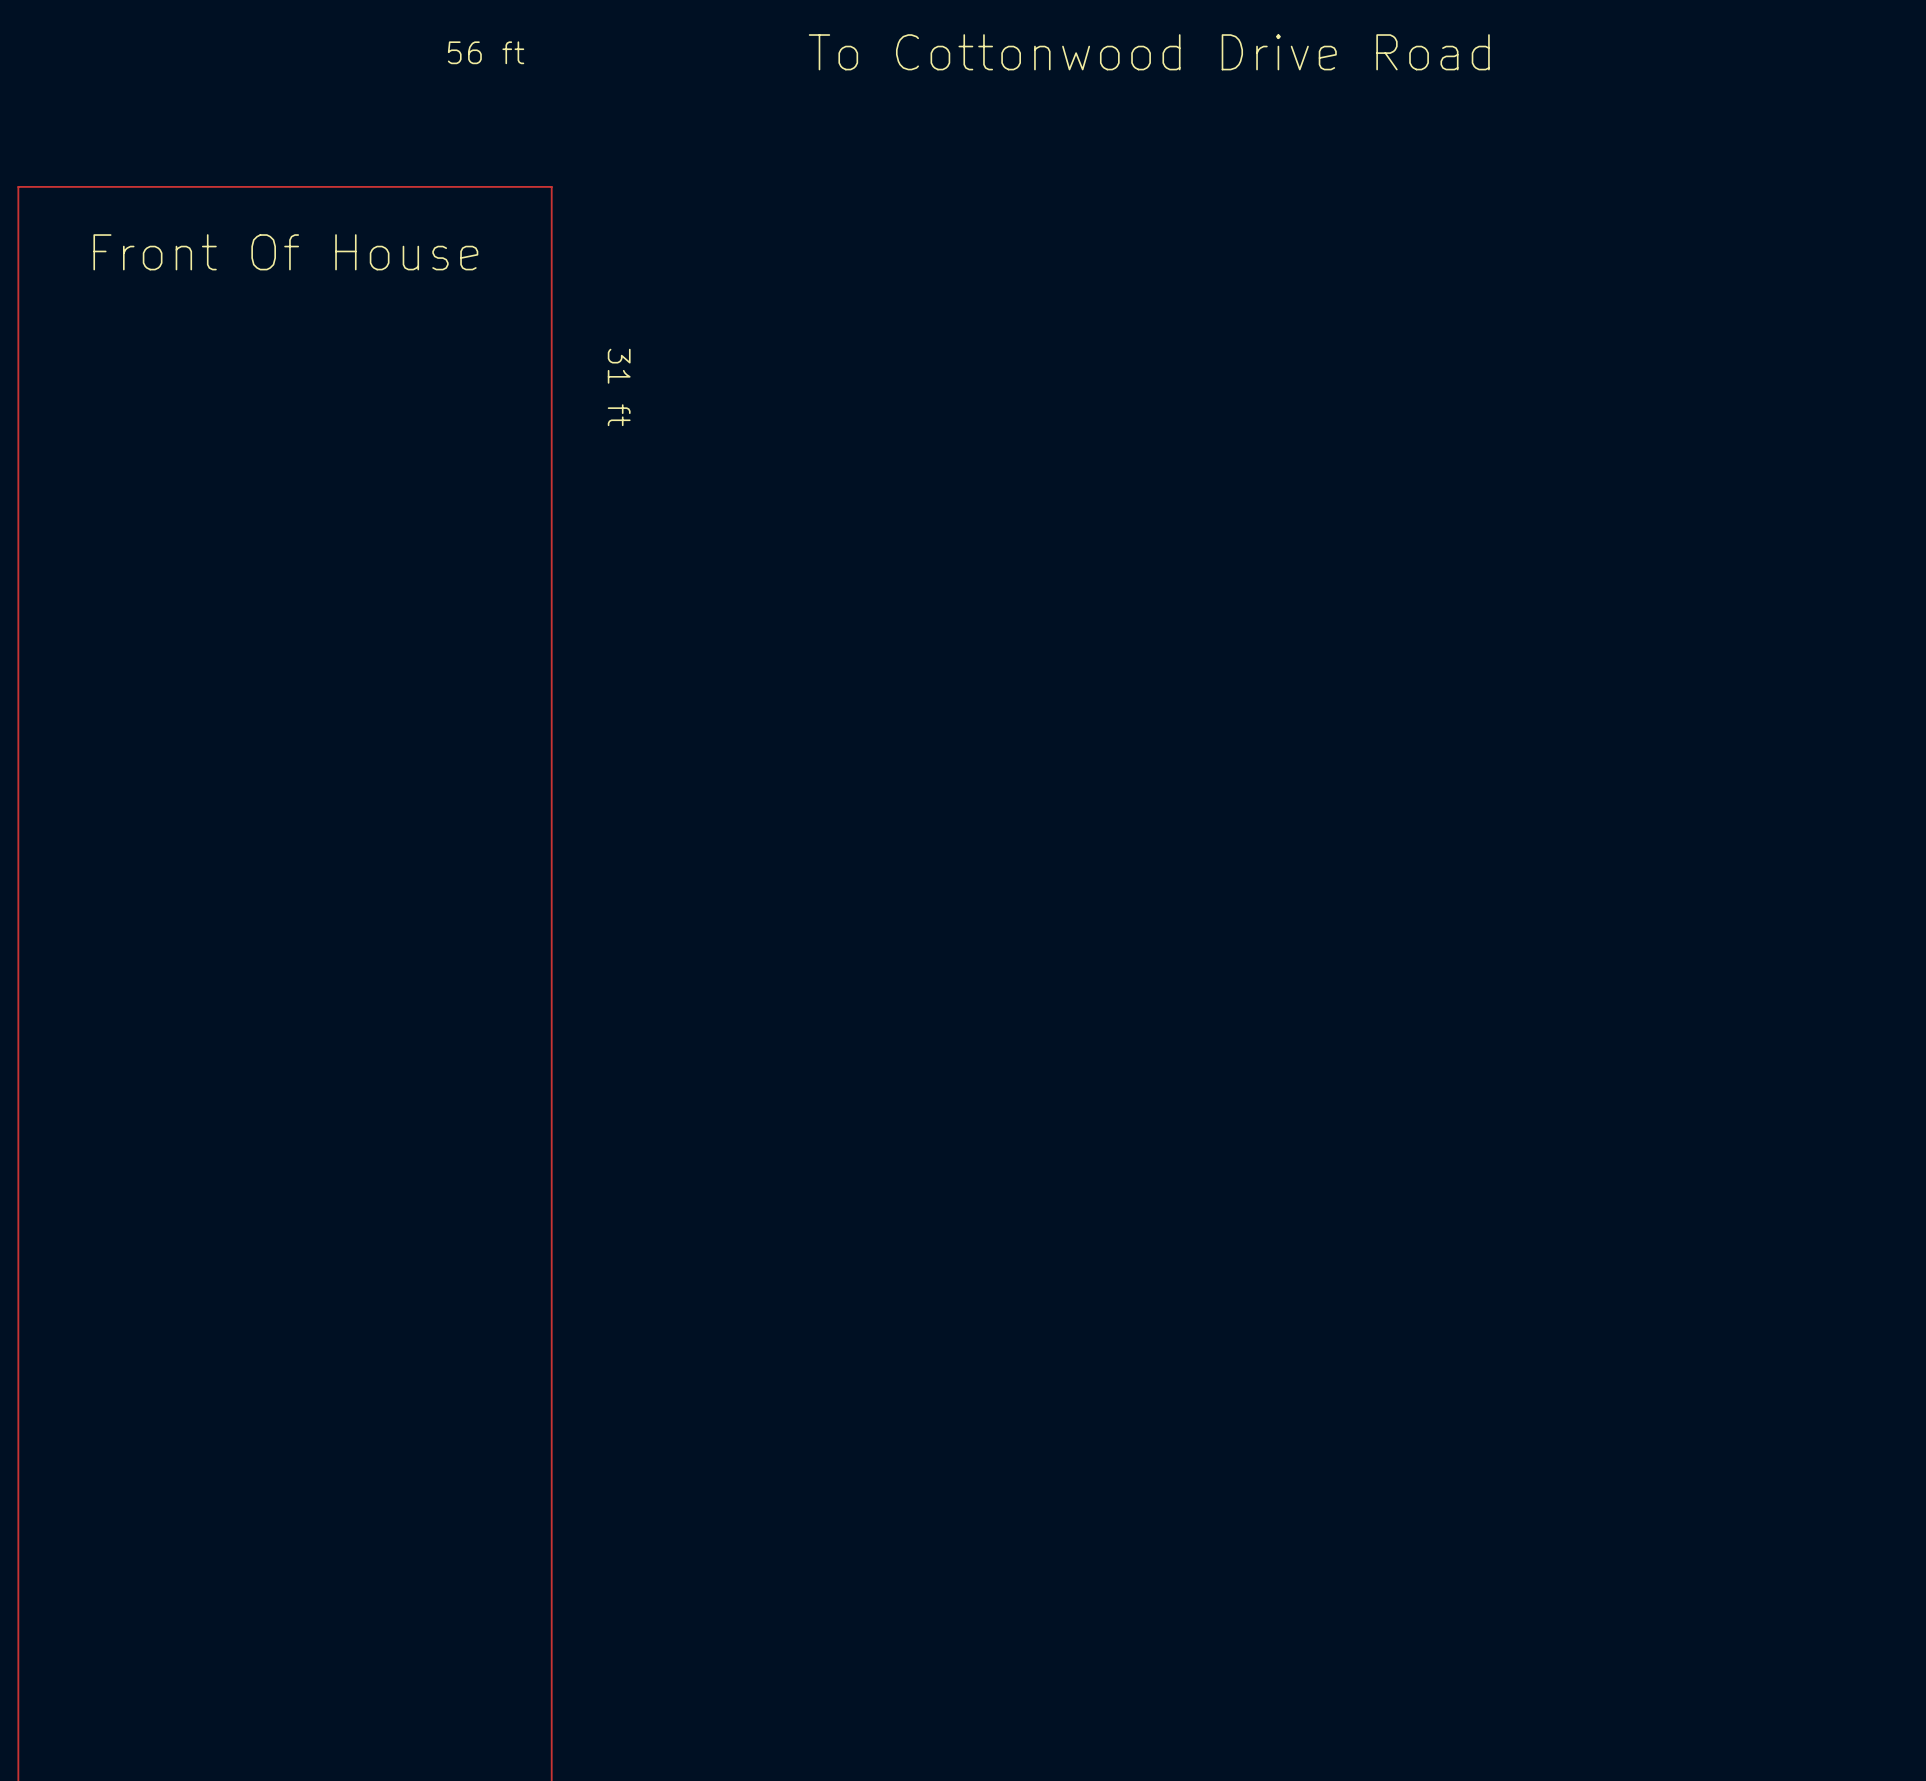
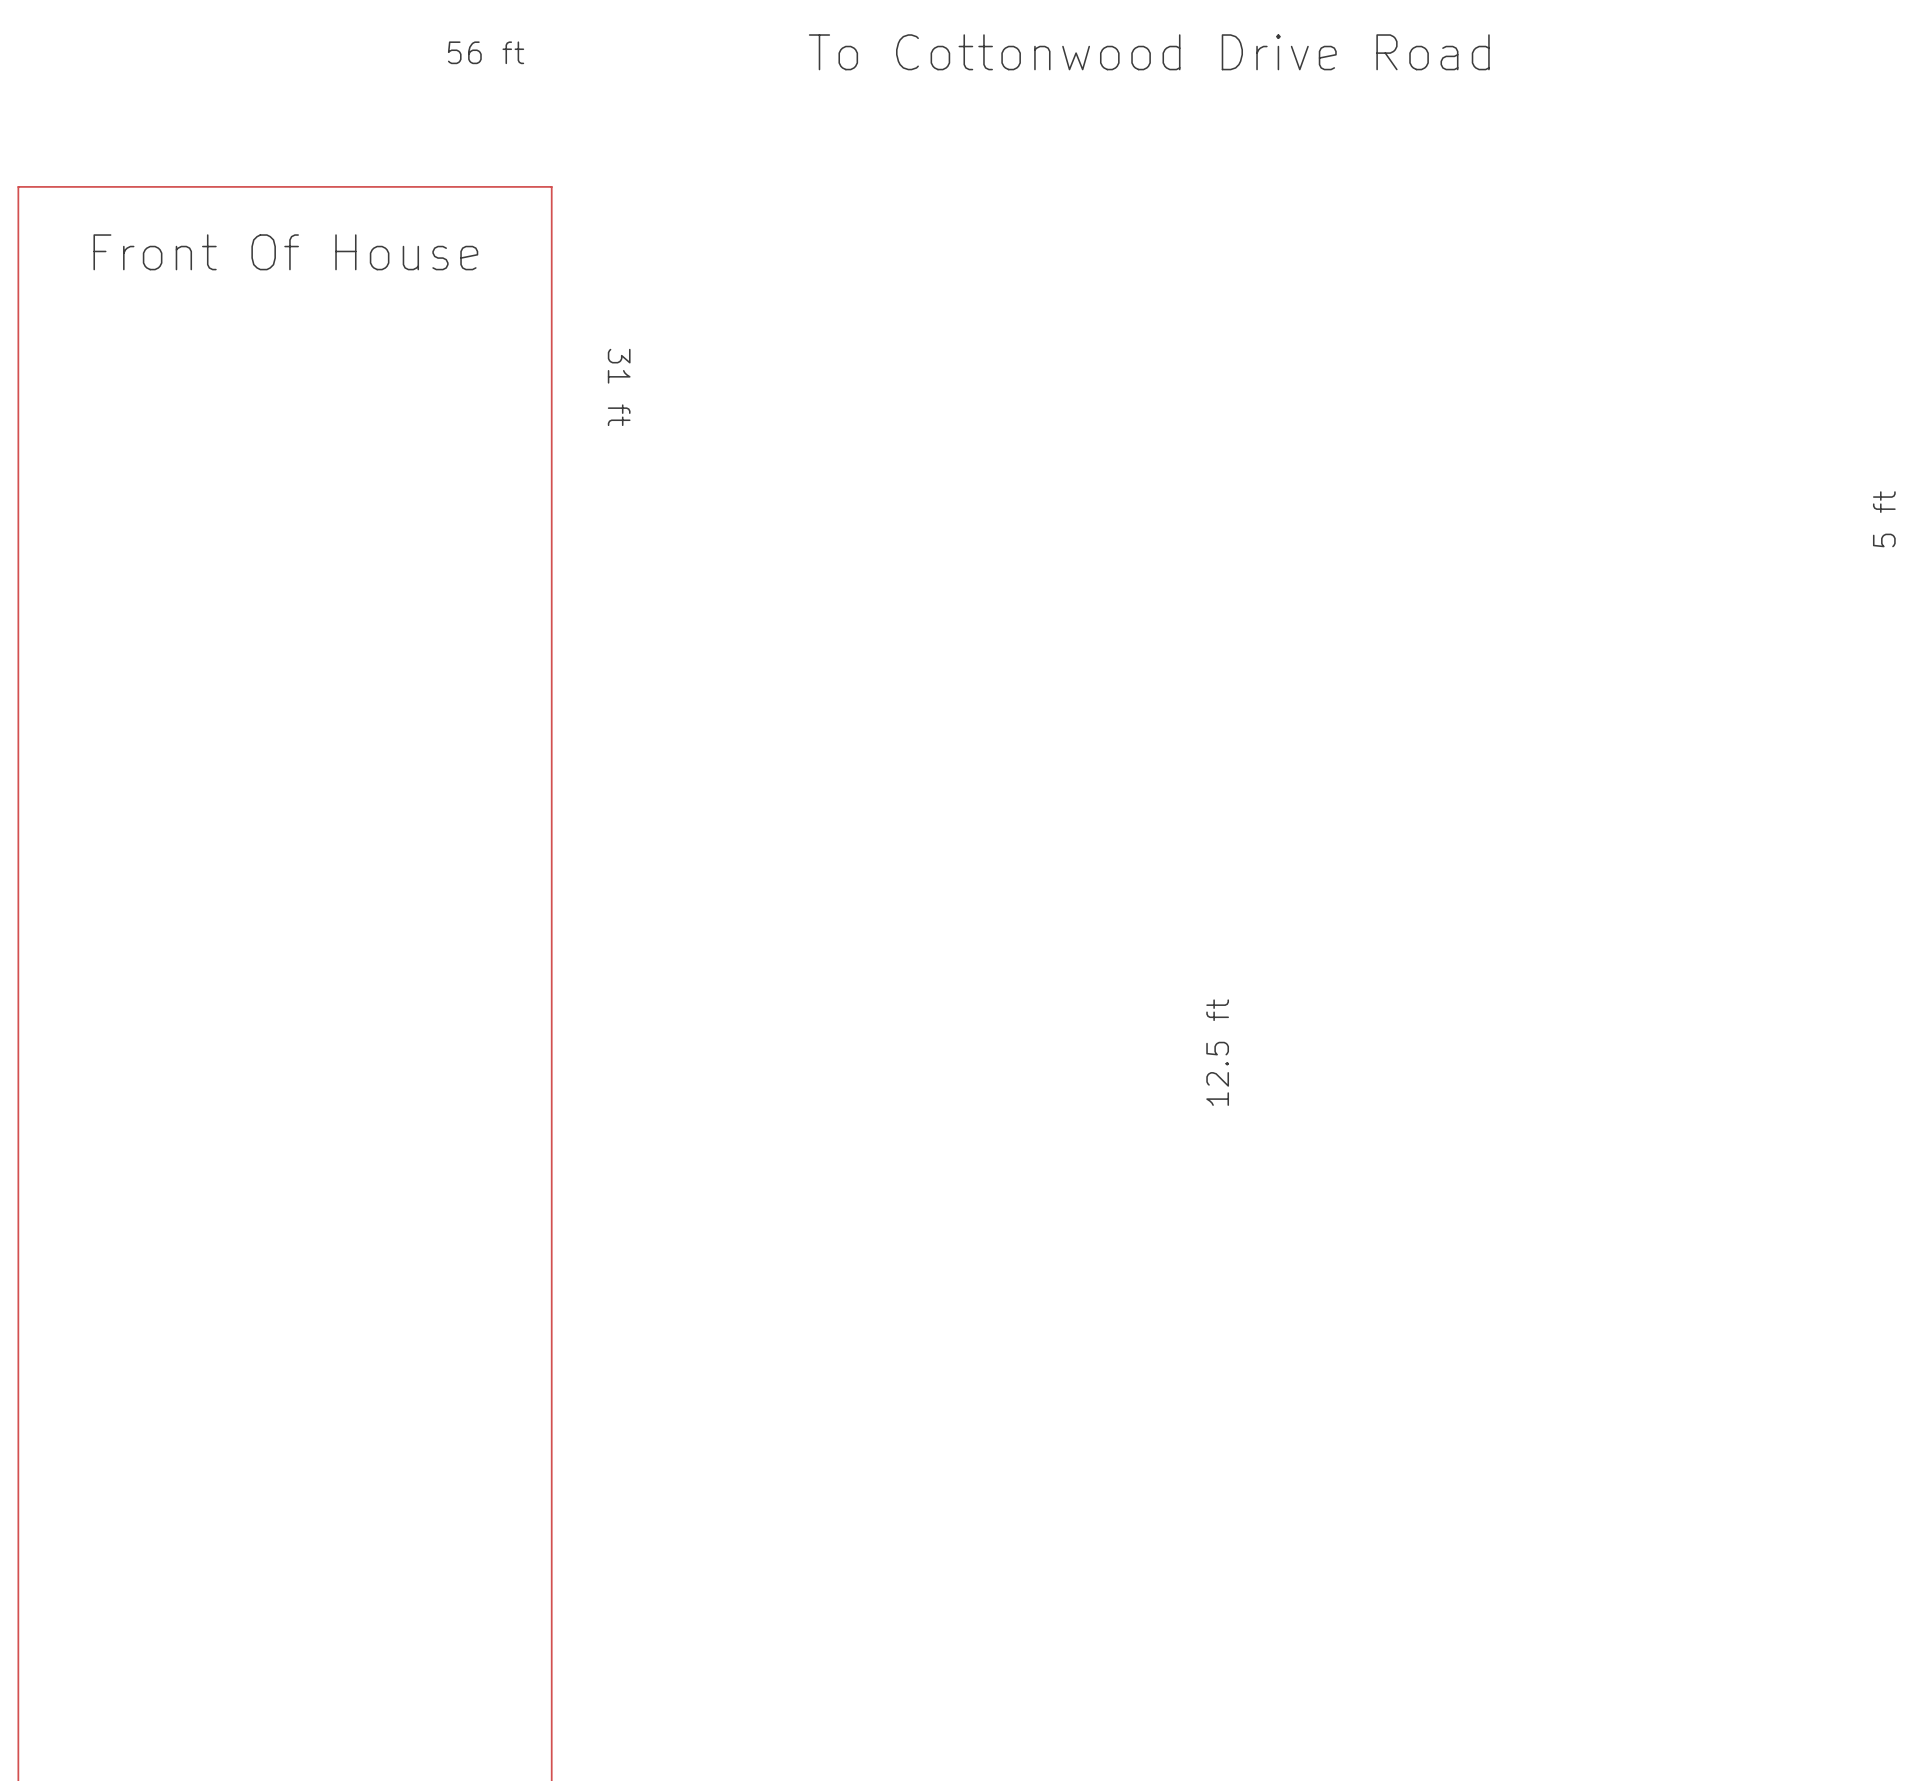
text: none -> 5 ft (1884, 519)
text: none -> 12.5 ft (1217, 1052)

